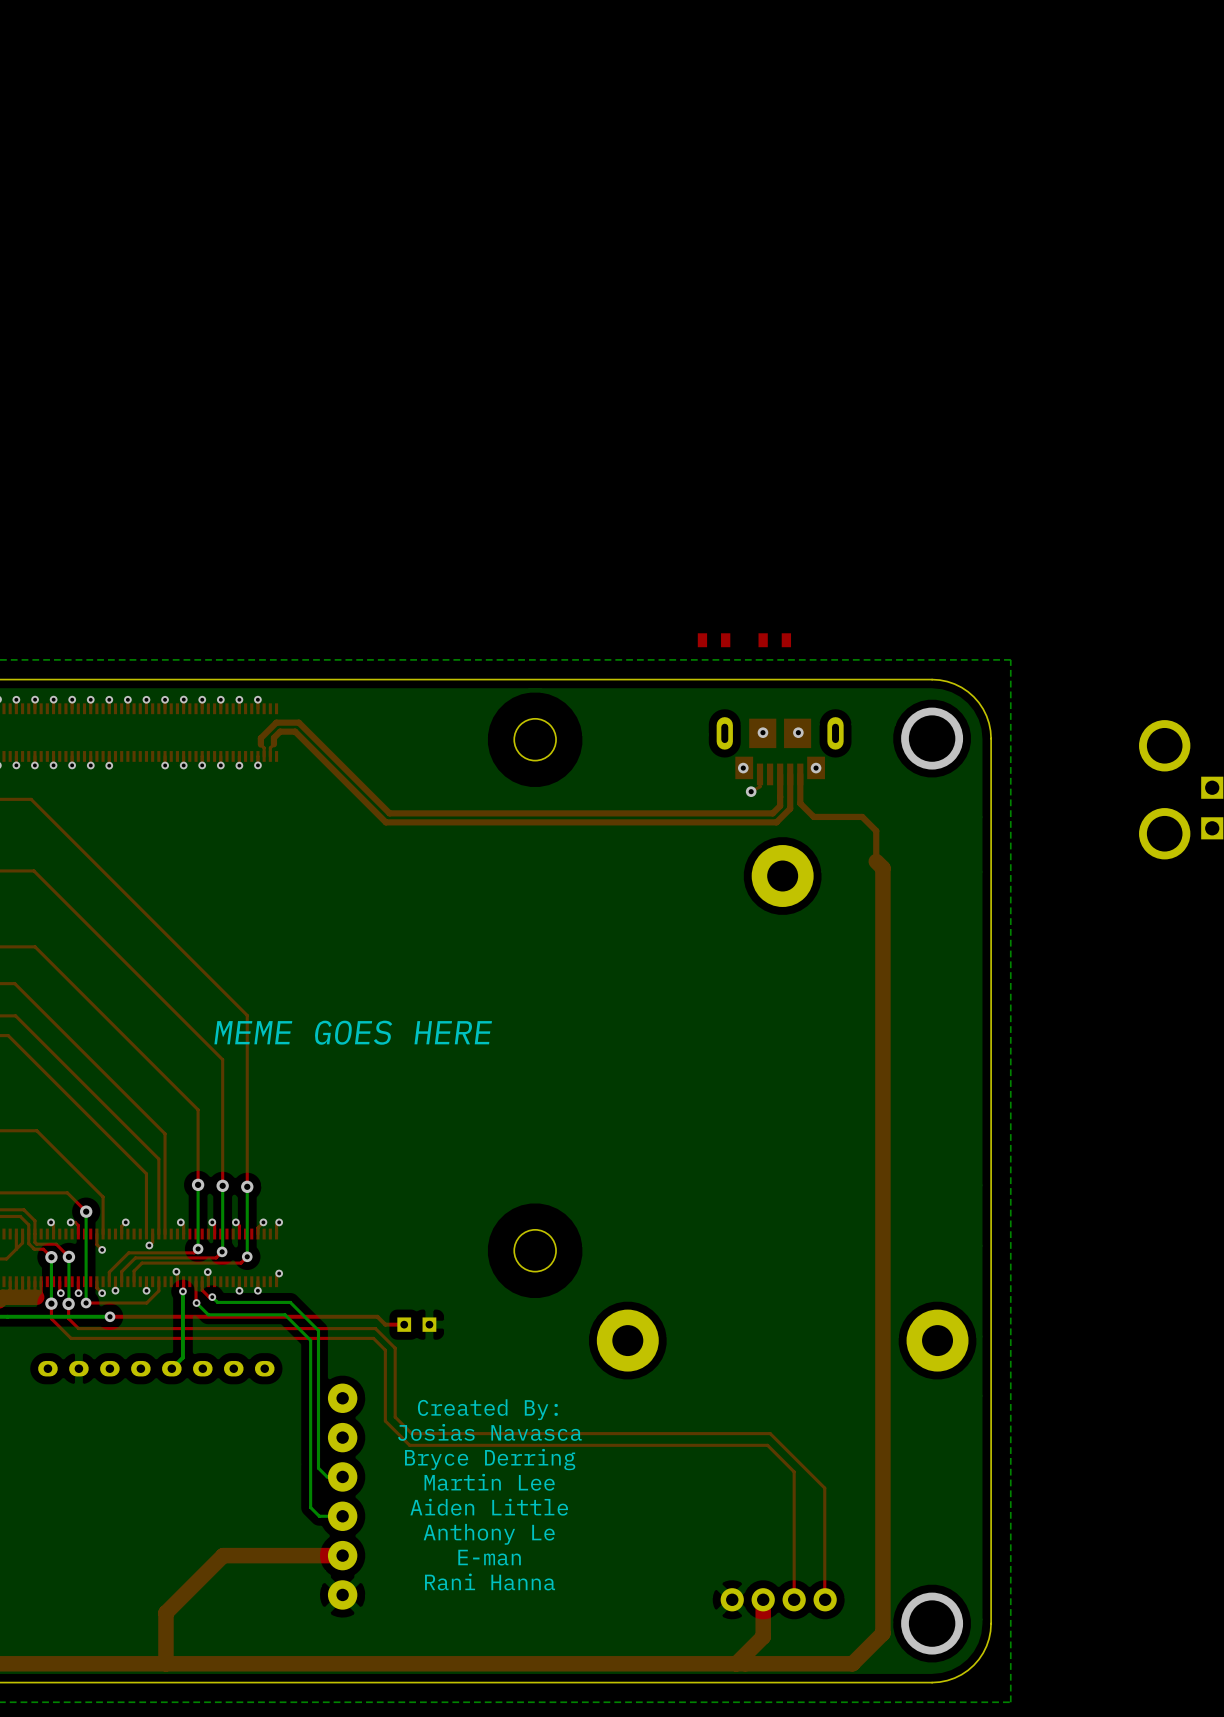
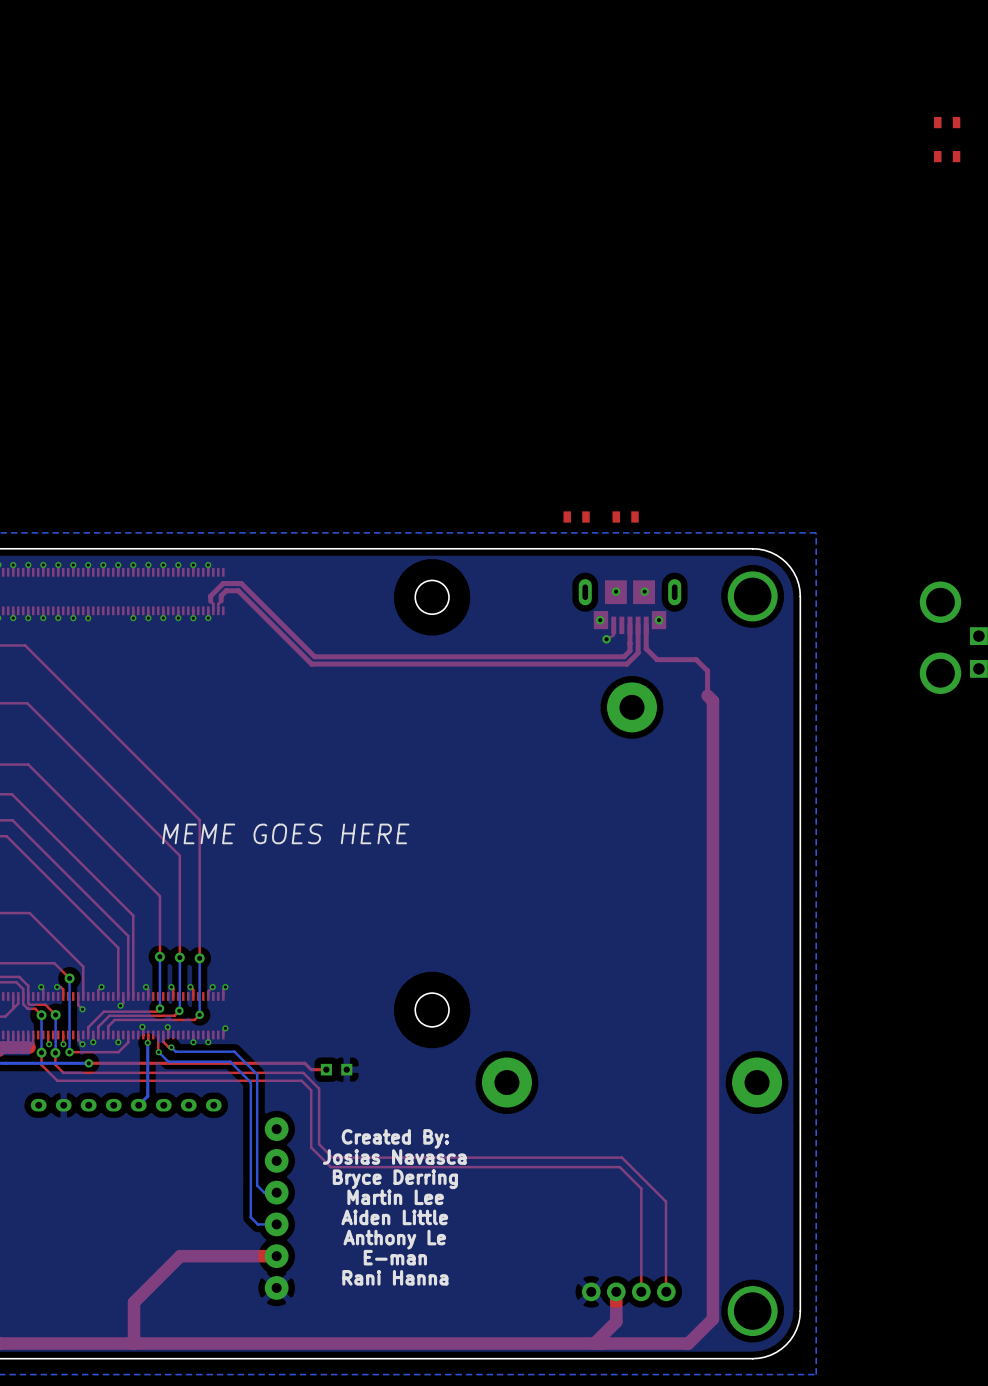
part: none -> (947, 122)
part: none -> (947, 156)

